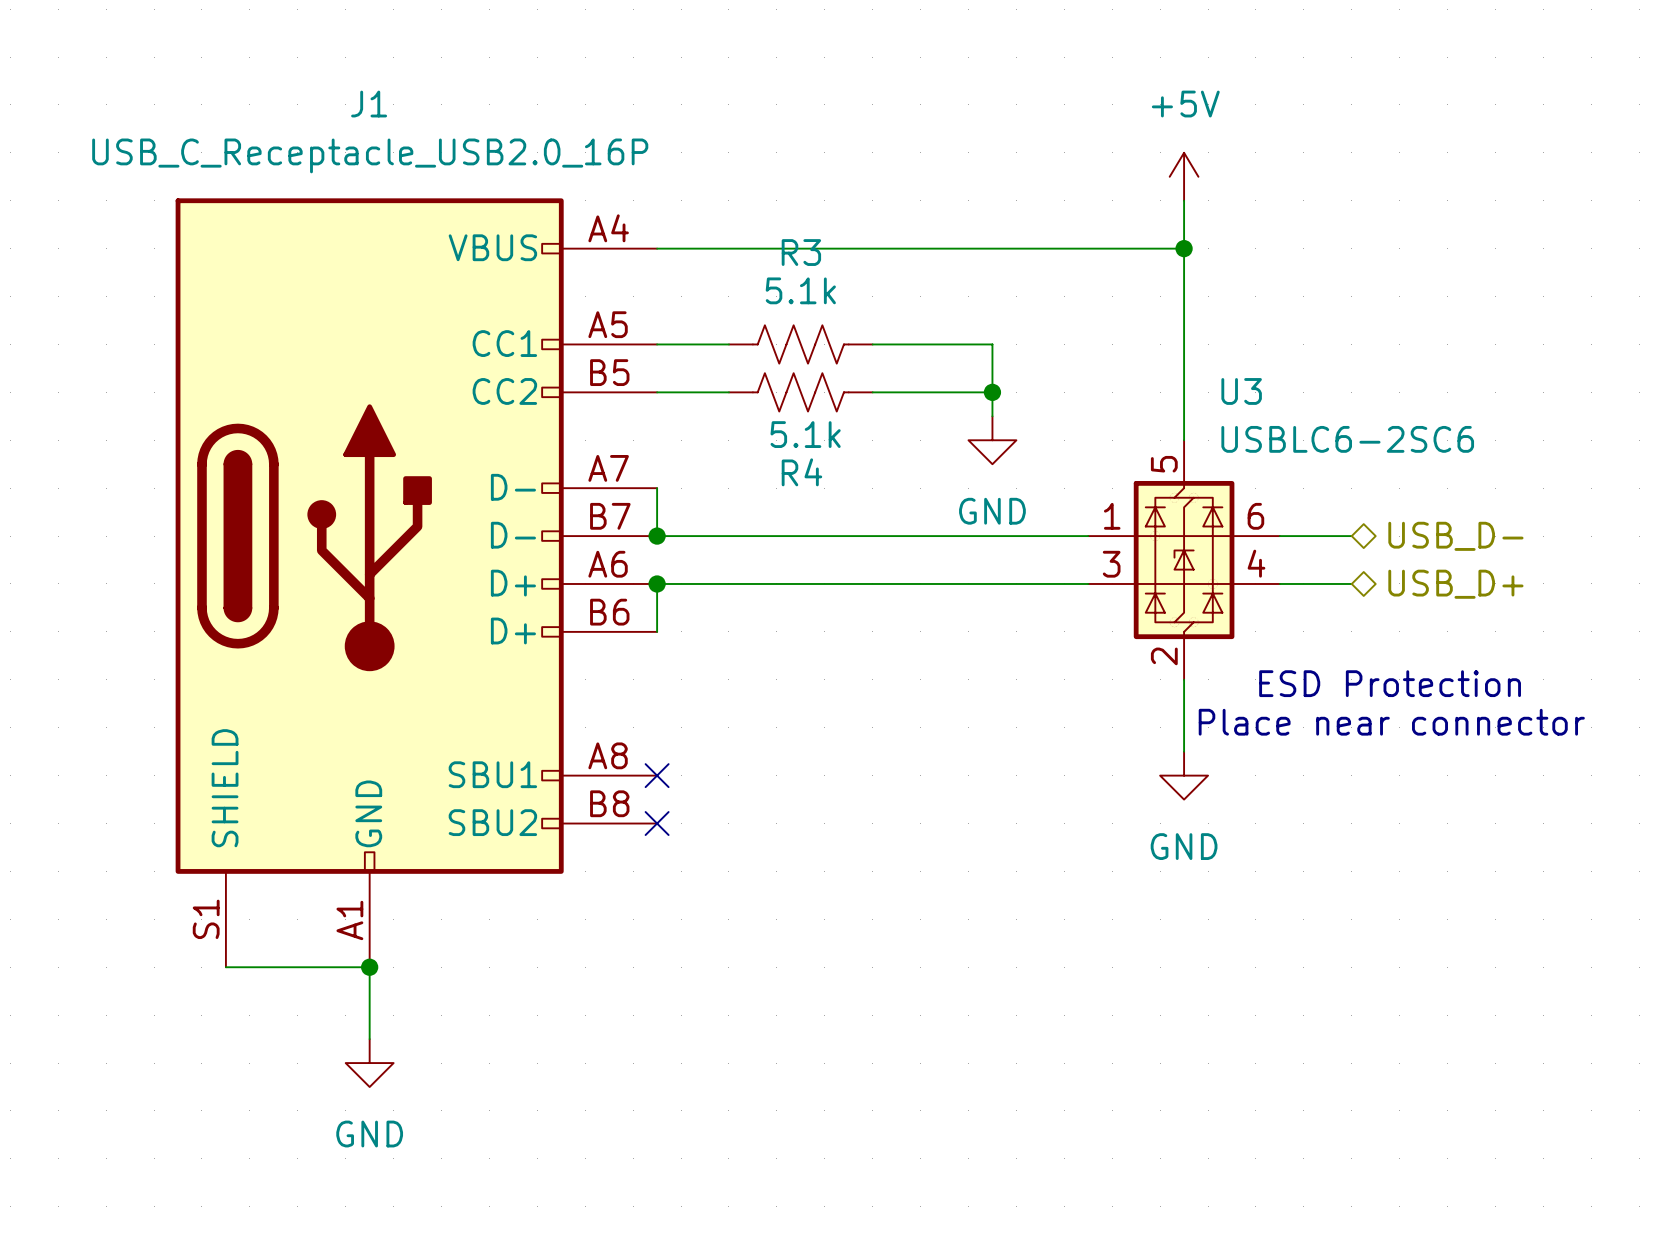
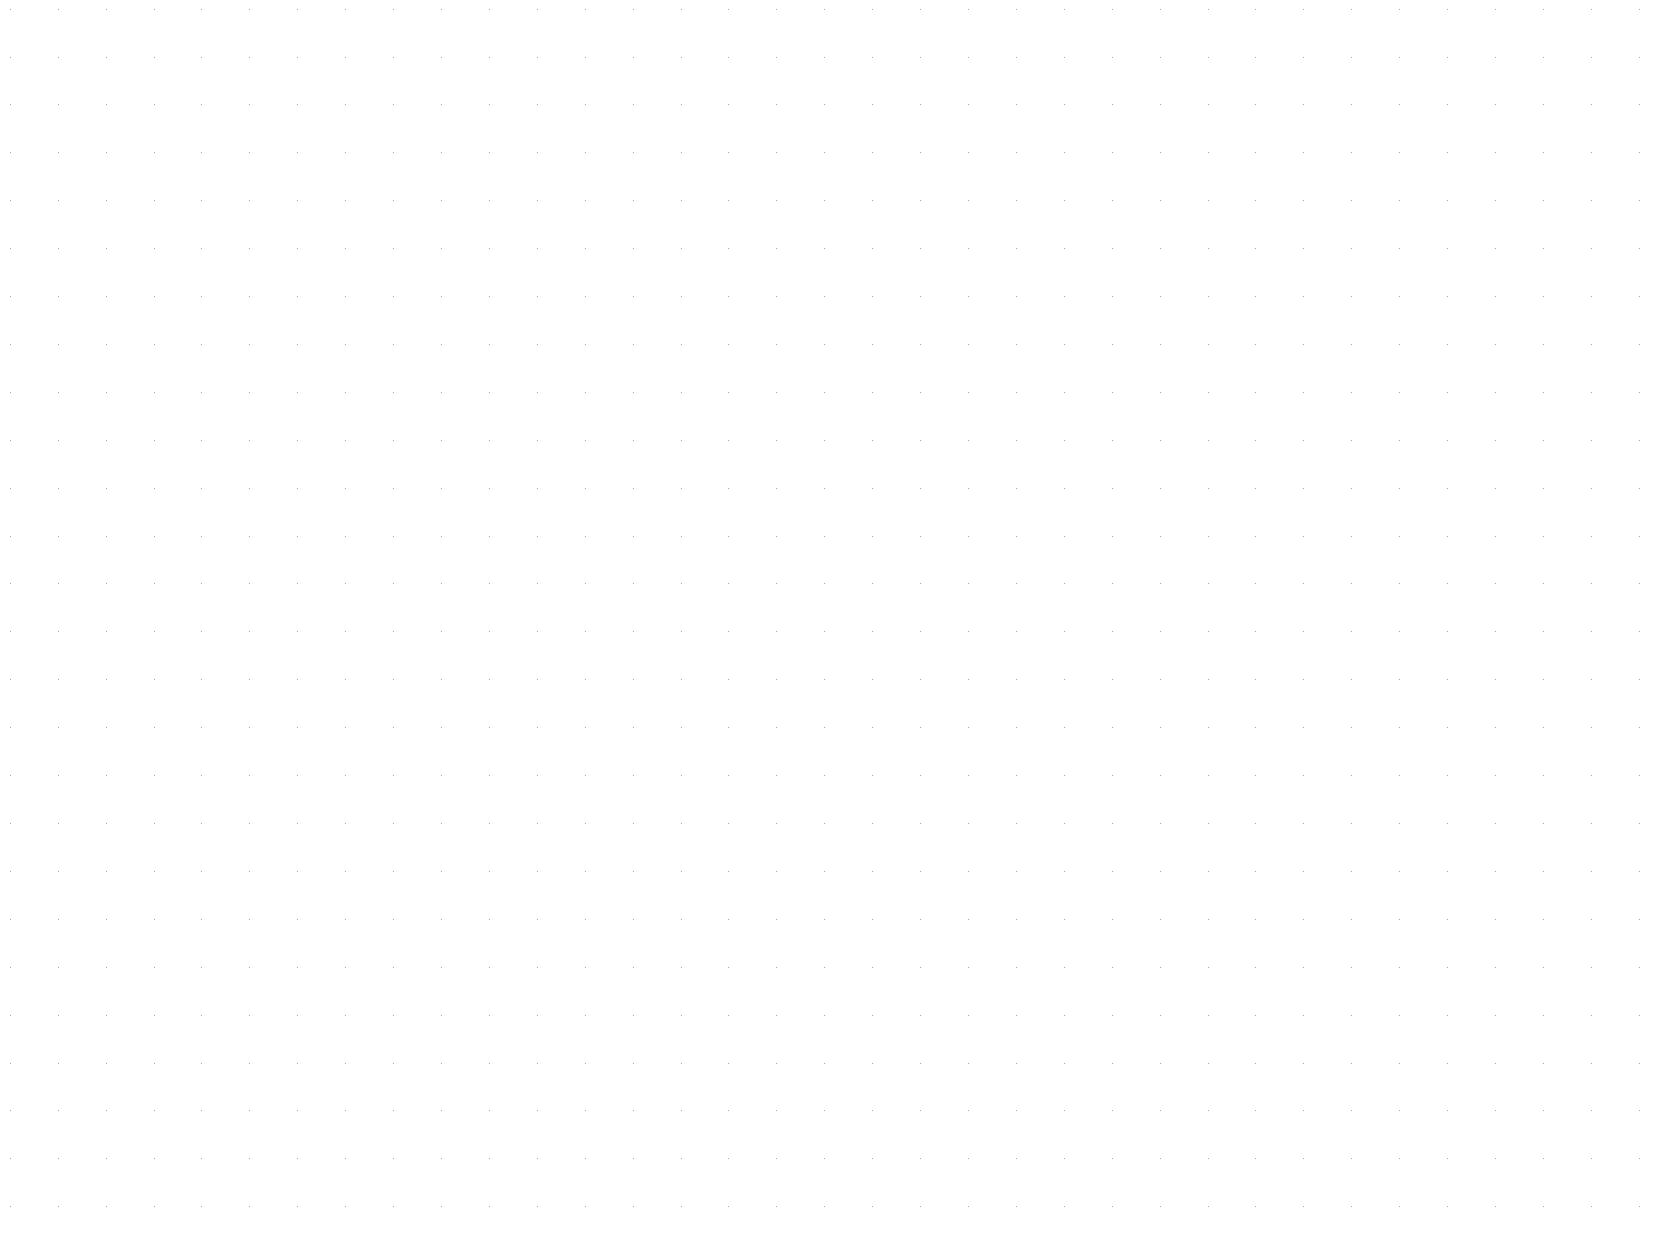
power symbol: +5V (1184, 176) -> none
wire: (1184, 200) (1184, 440) -> none
wire: (657, 248) (1184, 248) -> none
junction: (1184, 248) -> none
wire: (657, 344) (728, 344) -> none
R3: 5.1k (800, 344) -> none
wire: (872, 344) (992, 344) (992, 416) -> none
wire: (657, 392) (728, 392) -> none
R4: 5.1k (800, 392) -> none
wire: (872, 392) (992, 392) -> none
junction: (992, 392) -> none
power symbol: GND (992, 440) -> none
wire: (657, 488) (657, 536) (1088, 536) -> none
junction: (657, 536) -> none
wire: (1279, 536) (1351, 536) -> none
hierarchical label: USB_D- (1455, 536) -> none
U3: USBLC6-2SC6 (1184, 560) -> none
J1: USB_C_Receptacle_USB2.0_16P (416, 582) -> none
junction: (657, 583) -> none
wire: (1088, 583) (657, 583) (657, 631) -> none
wire: (1279, 583) (1351, 583) -> none
hierarchical label: USB_D+ (1455, 584) -> none
wire: (1184, 679) (1184, 751) -> none
text: ESD Protection (1390, 683) -> none
text: Place near connector (1391, 722) -> none
no-connect mark: (657, 775) -> none
power symbol: GND (1184, 775) -> none
no-connect mark: (657, 823) -> none
wire: (225, 967) (369, 967) (369, 1039) -> none
junction: (369, 967) -> none
power symbol: GND (369, 1063) -> none

